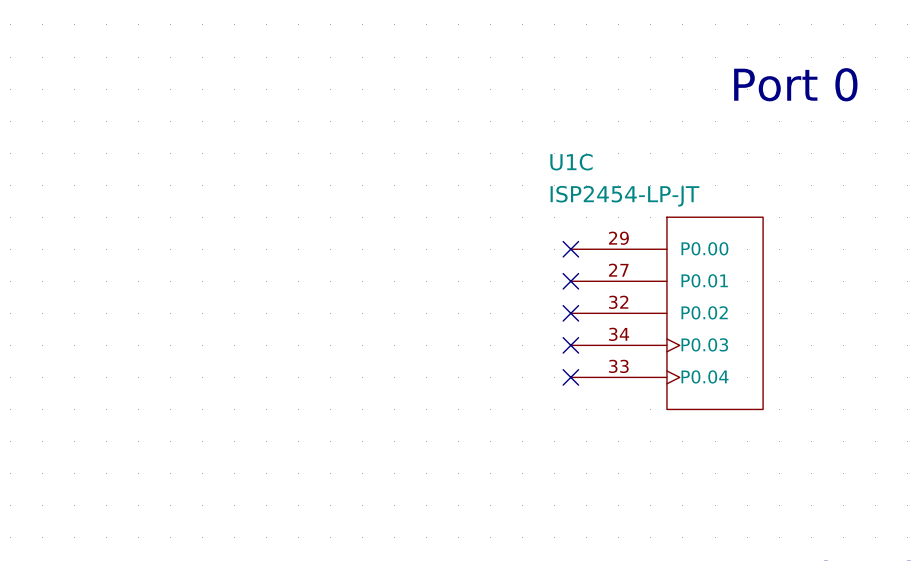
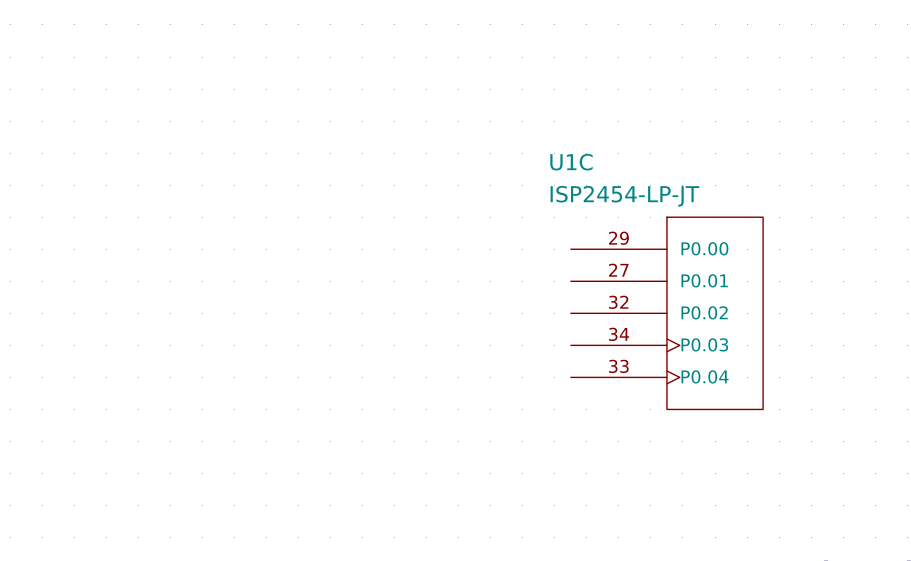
text: Port 0 (795, 84) -> none
no-connect mark: (570, 249) -> none
no-connect mark: (570, 281) -> none
no-connect mark: (570, 313) -> none
no-connect mark: (570, 345) -> none
no-connect mark: (570, 377) -> none

